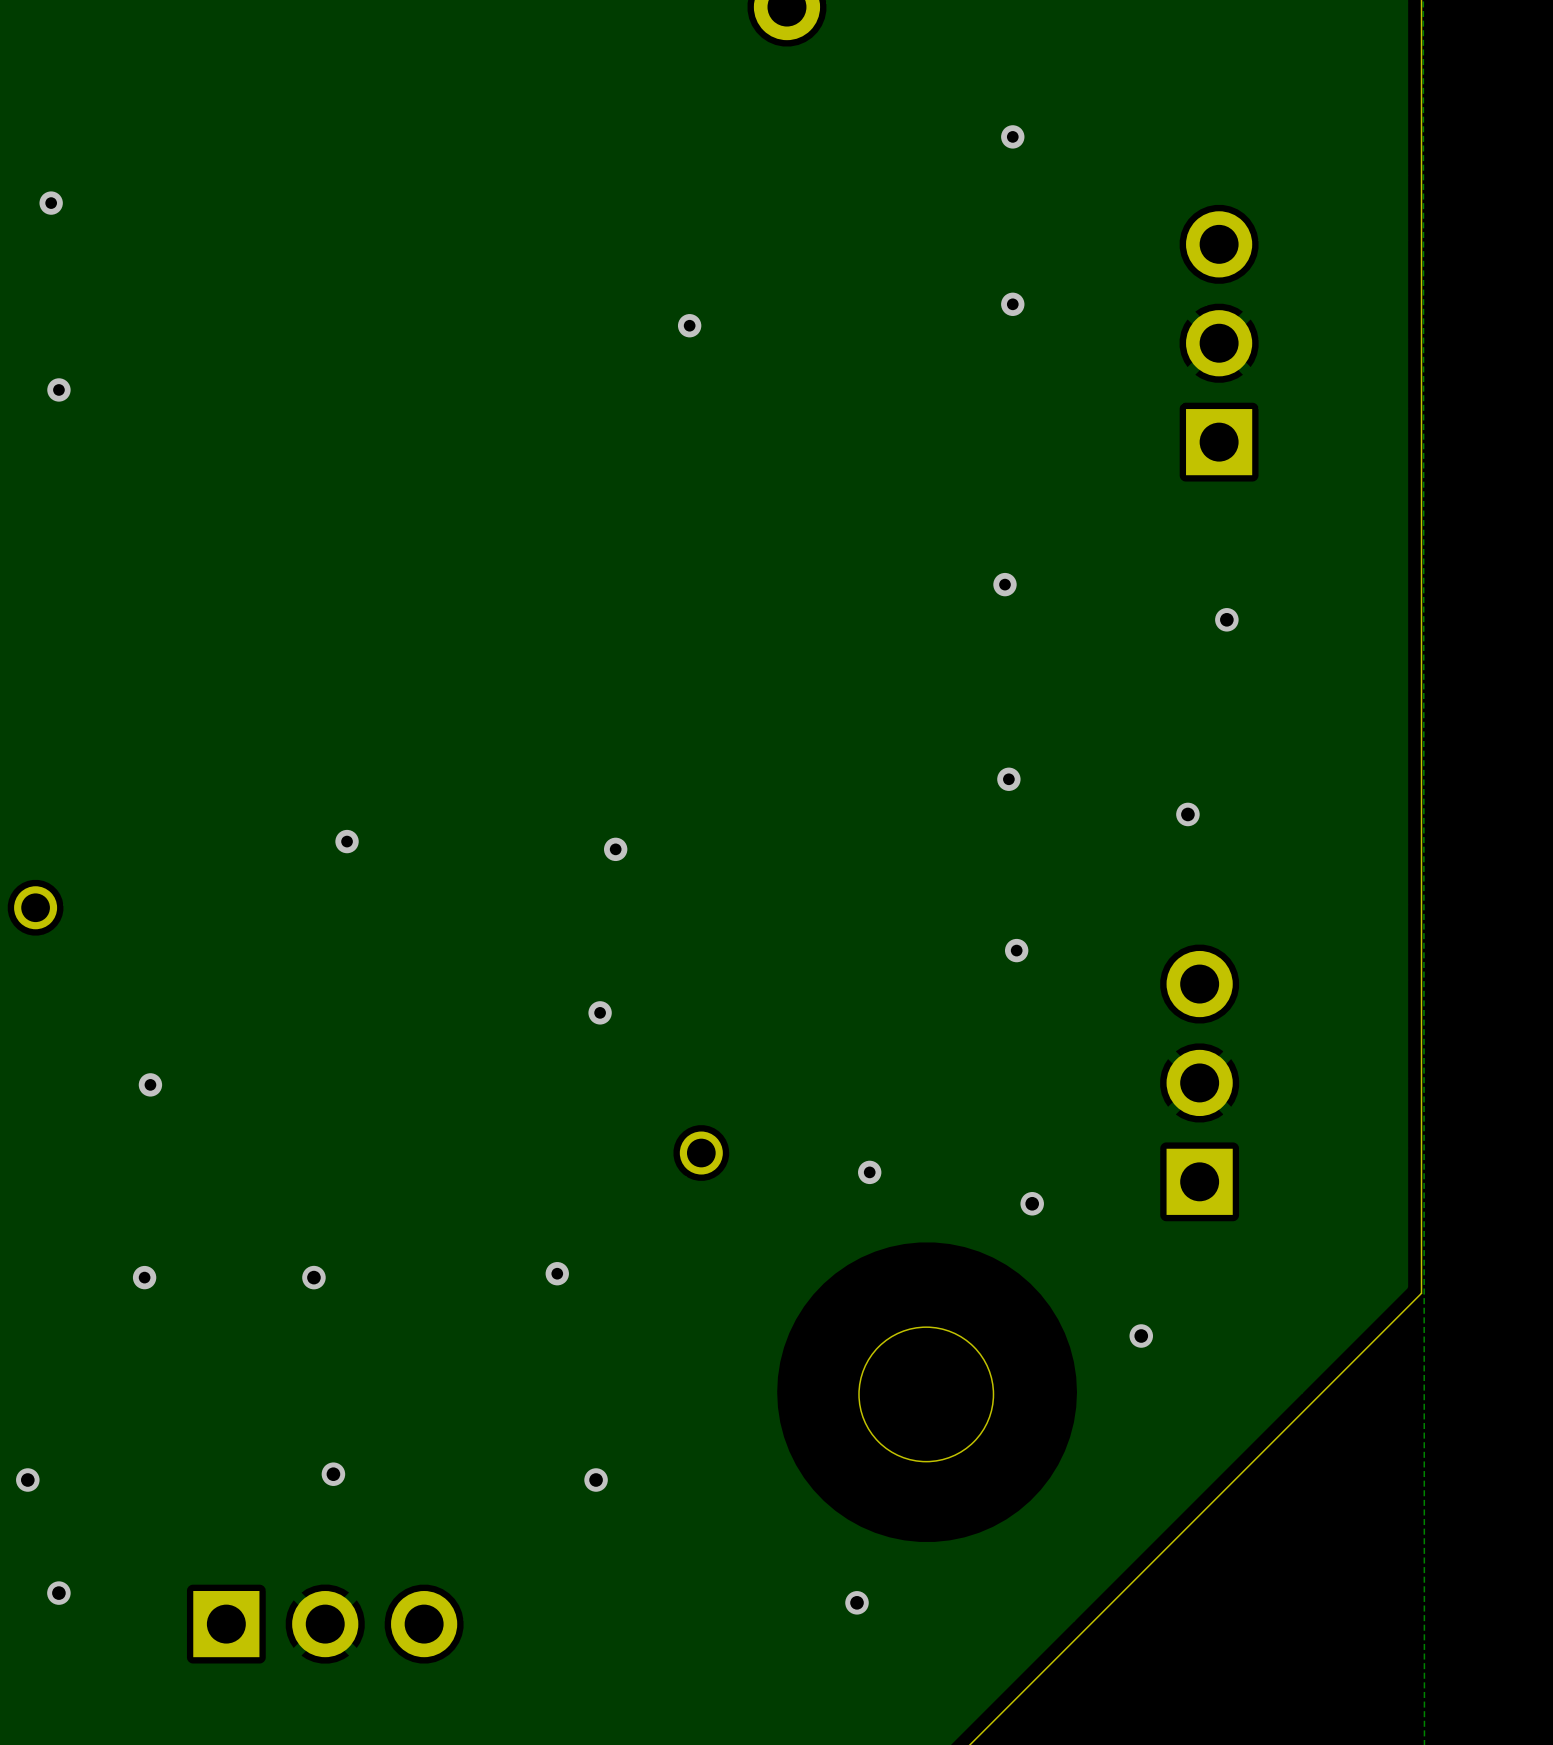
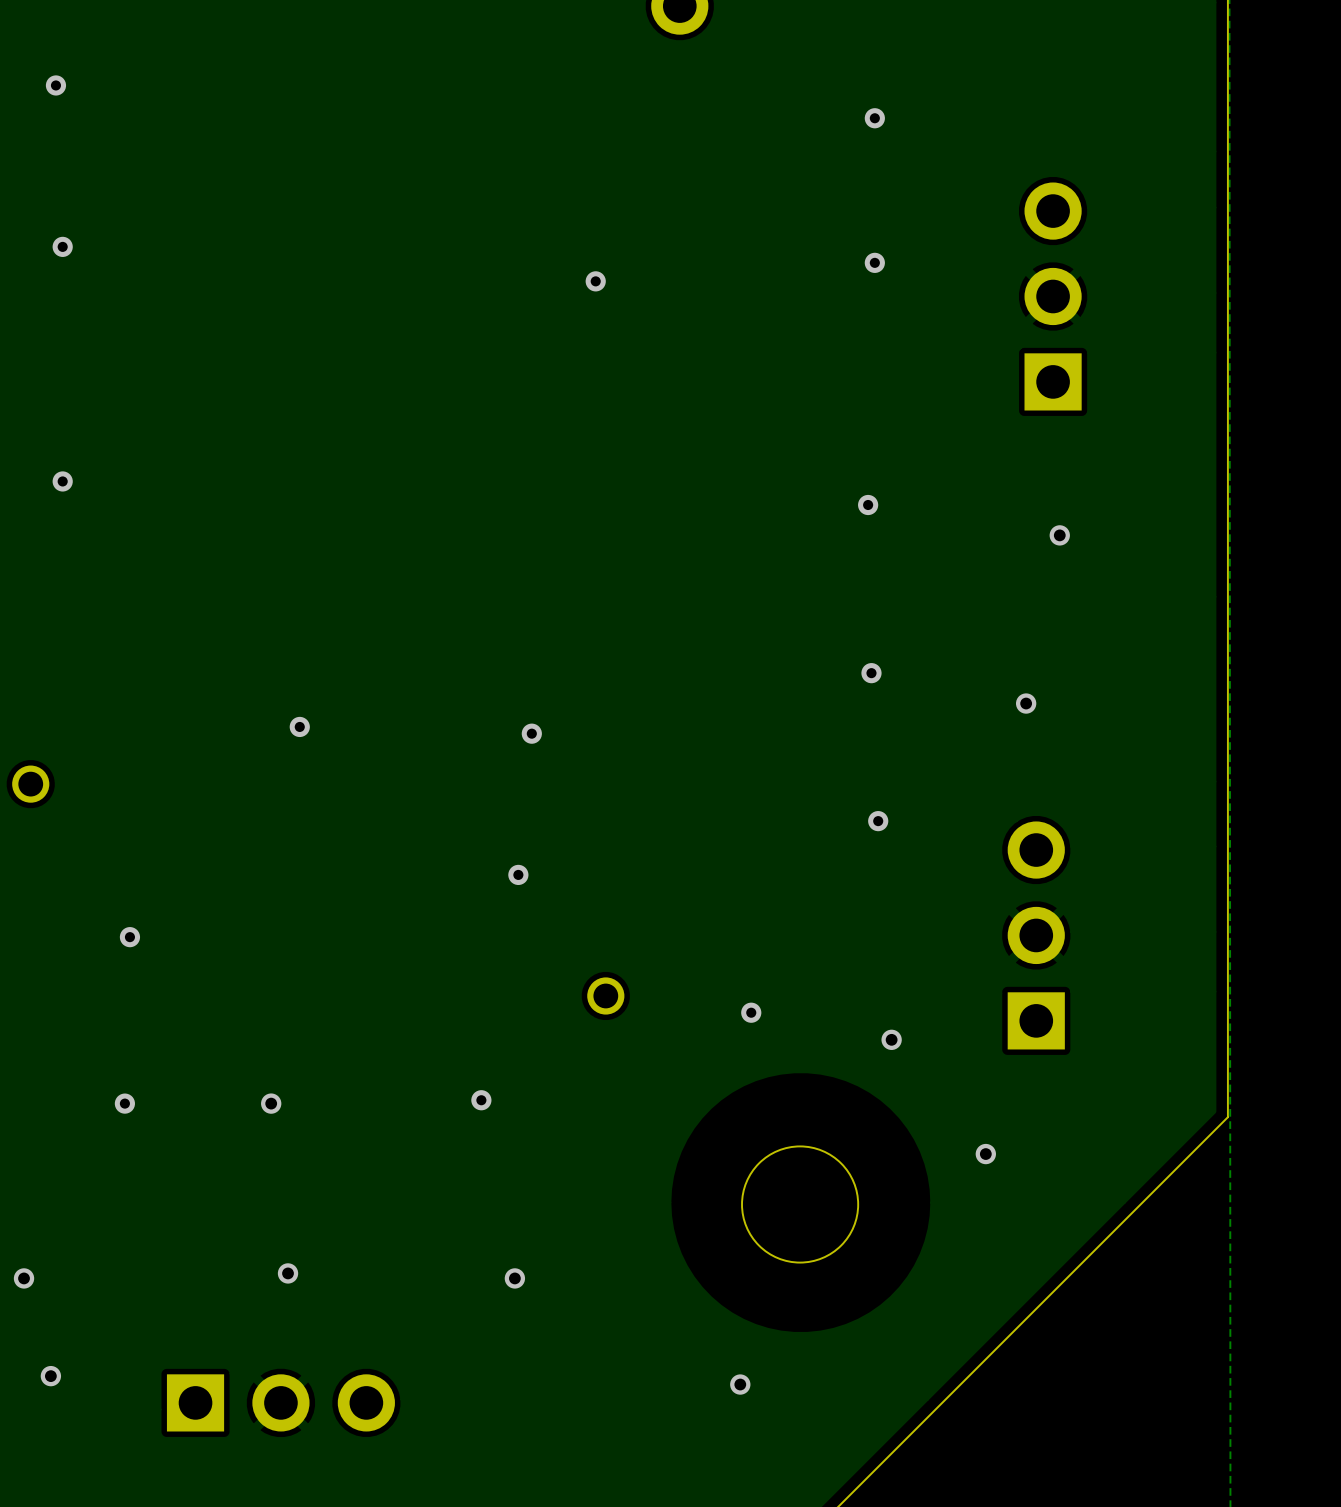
via: none -> (55, 85)
via: (51, 203) -> none
via: none -> (62, 246)
via: (58, 389) -> none
via: none -> (62, 481)

